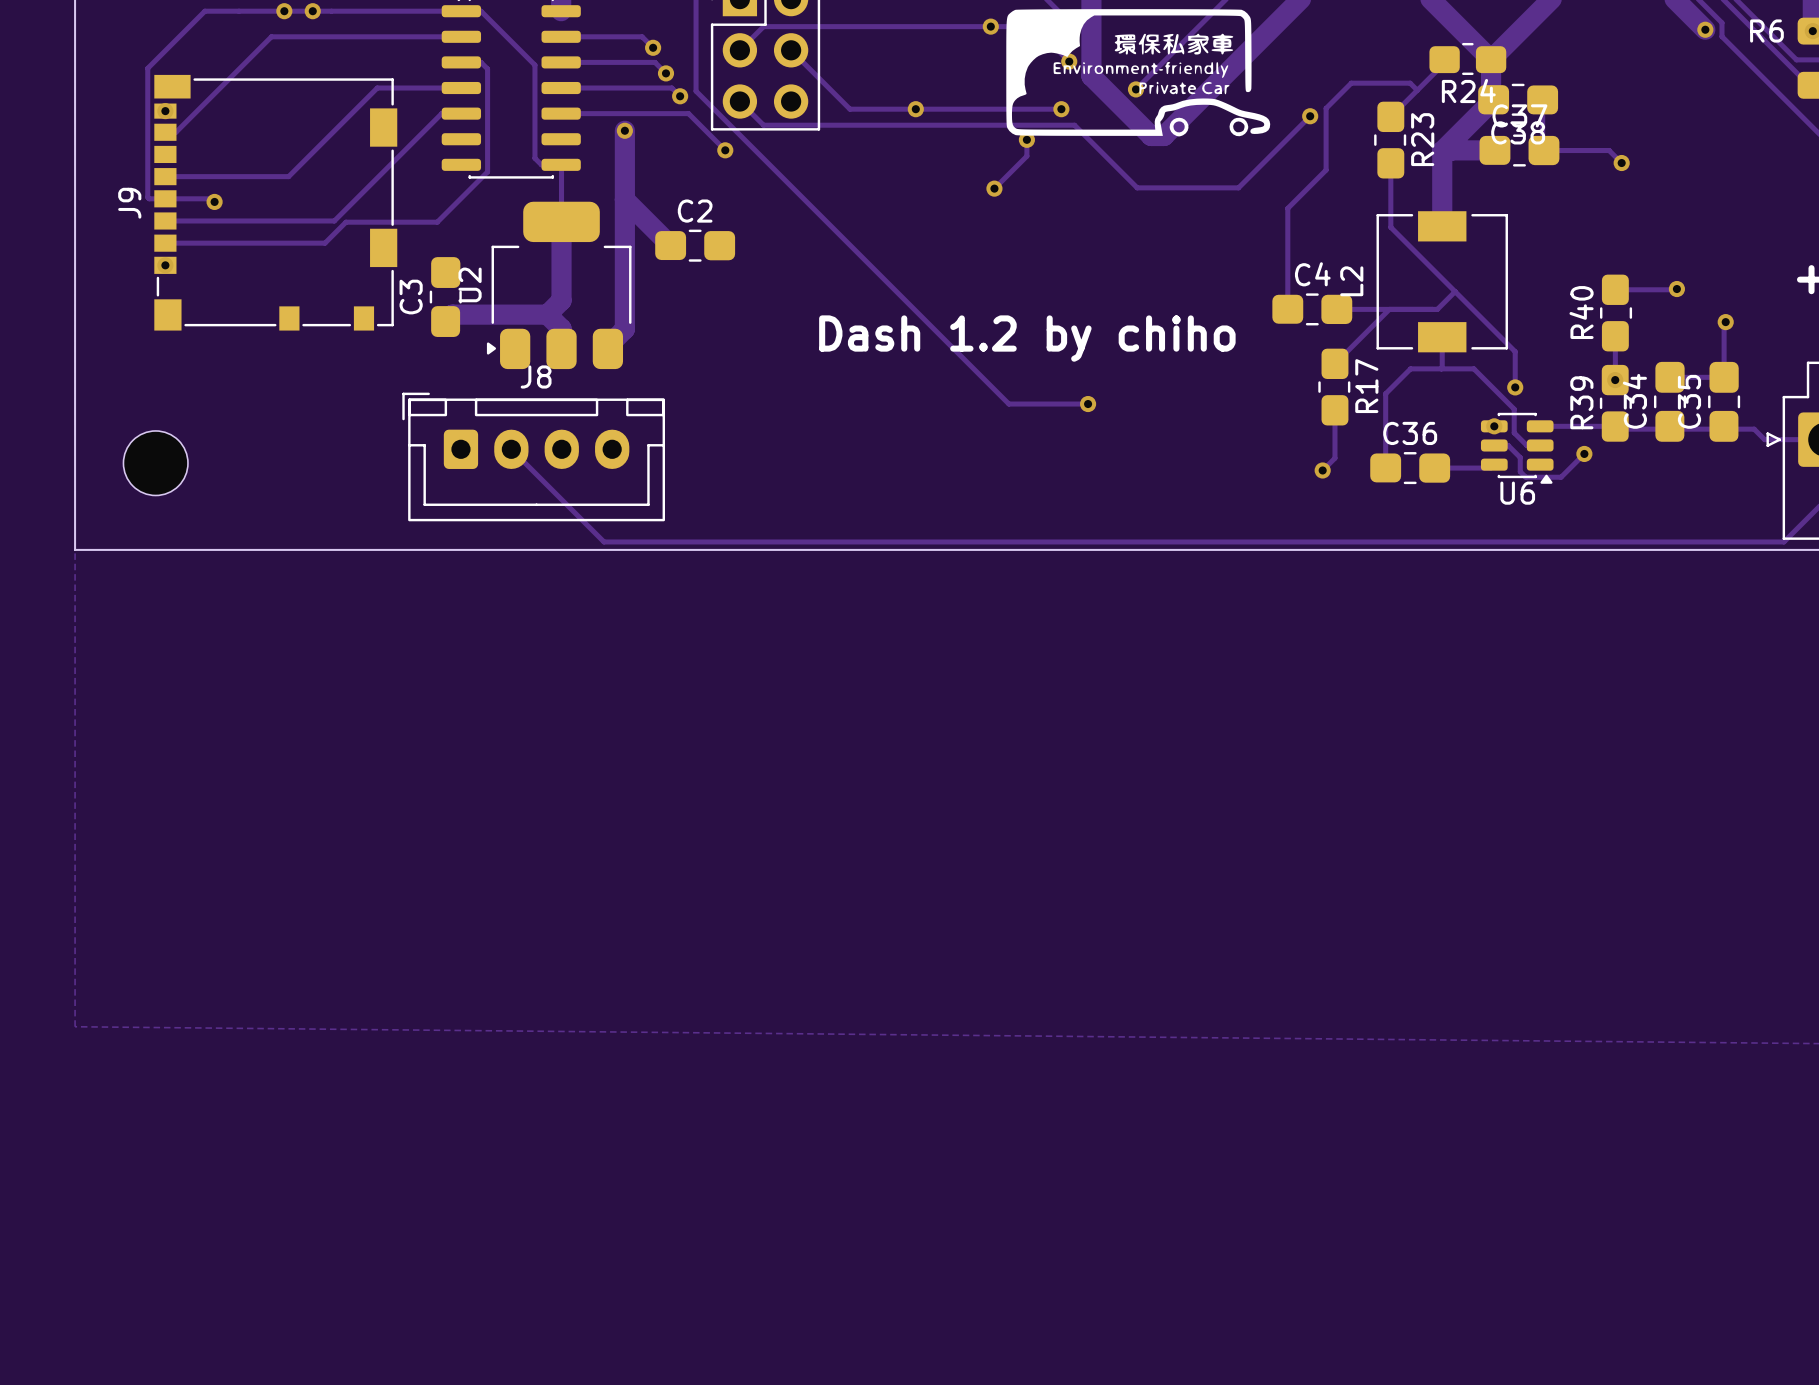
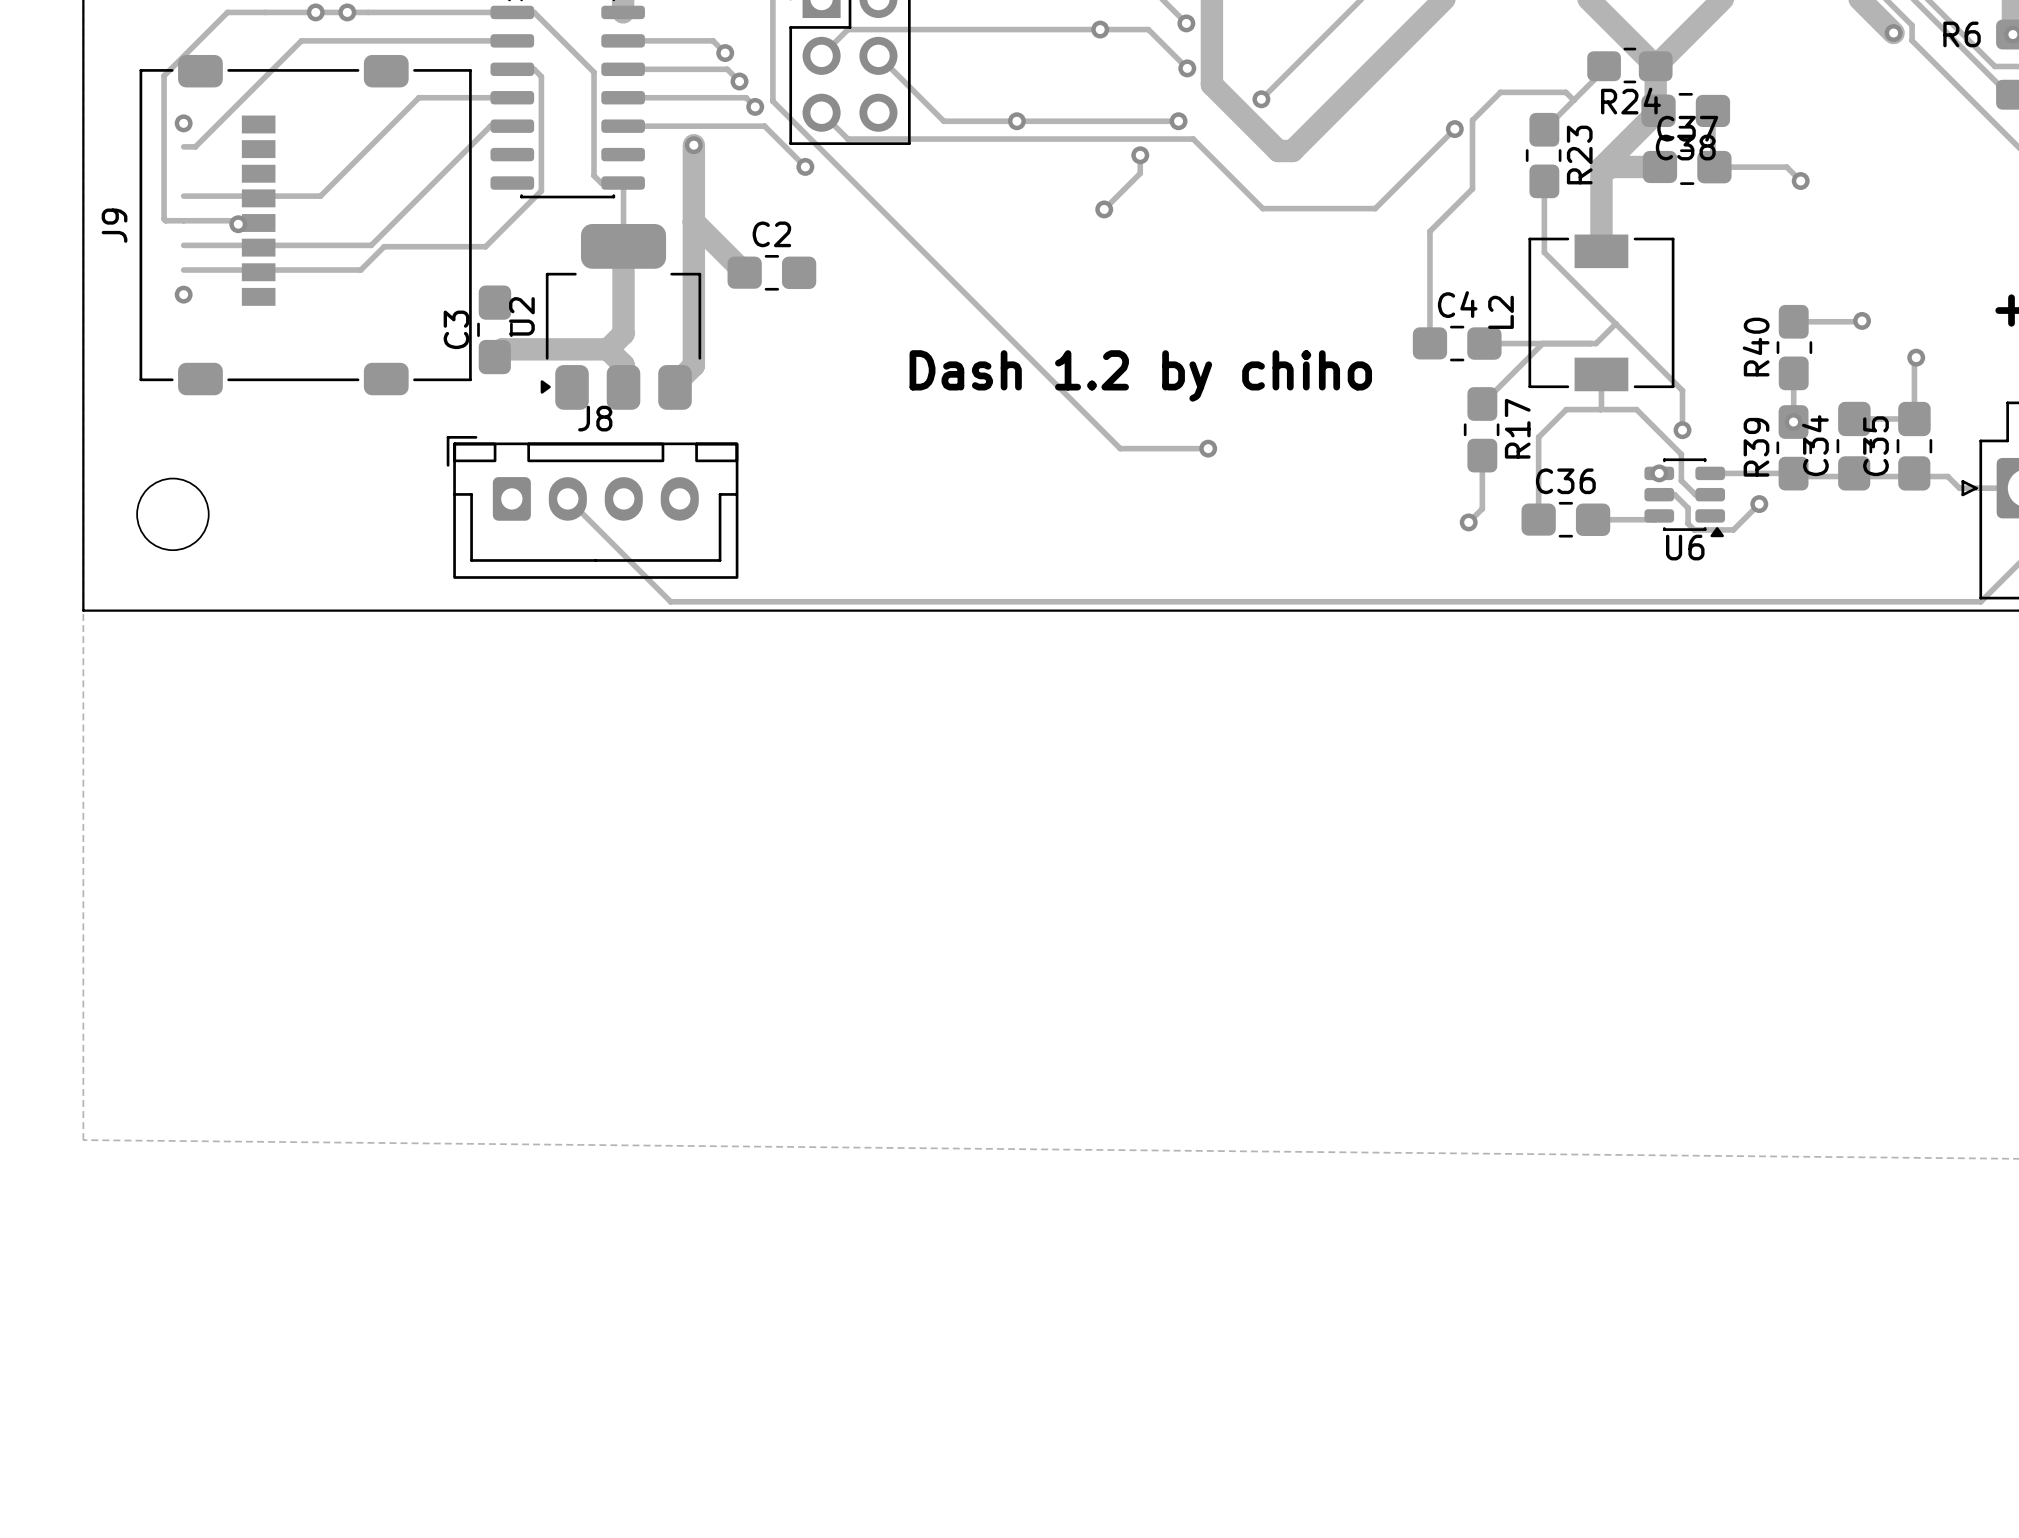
drawing: [1006, 9, 1271, 137] -> none
J9 footprint: [154, 74, 398, 331] -> [139, 54, 472, 396]

